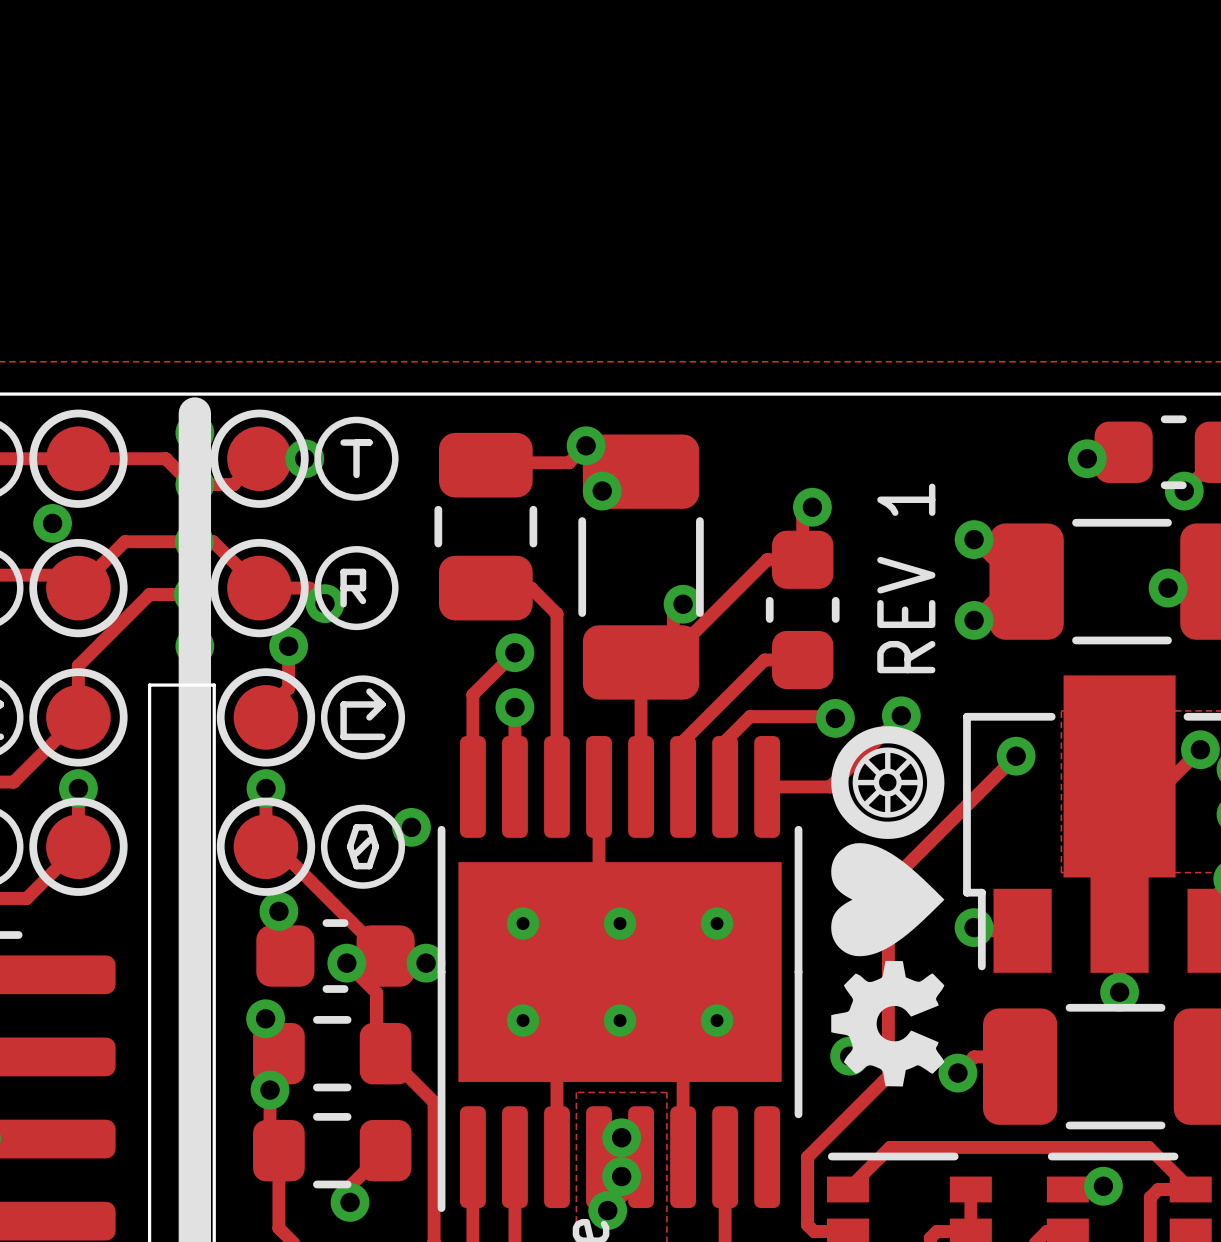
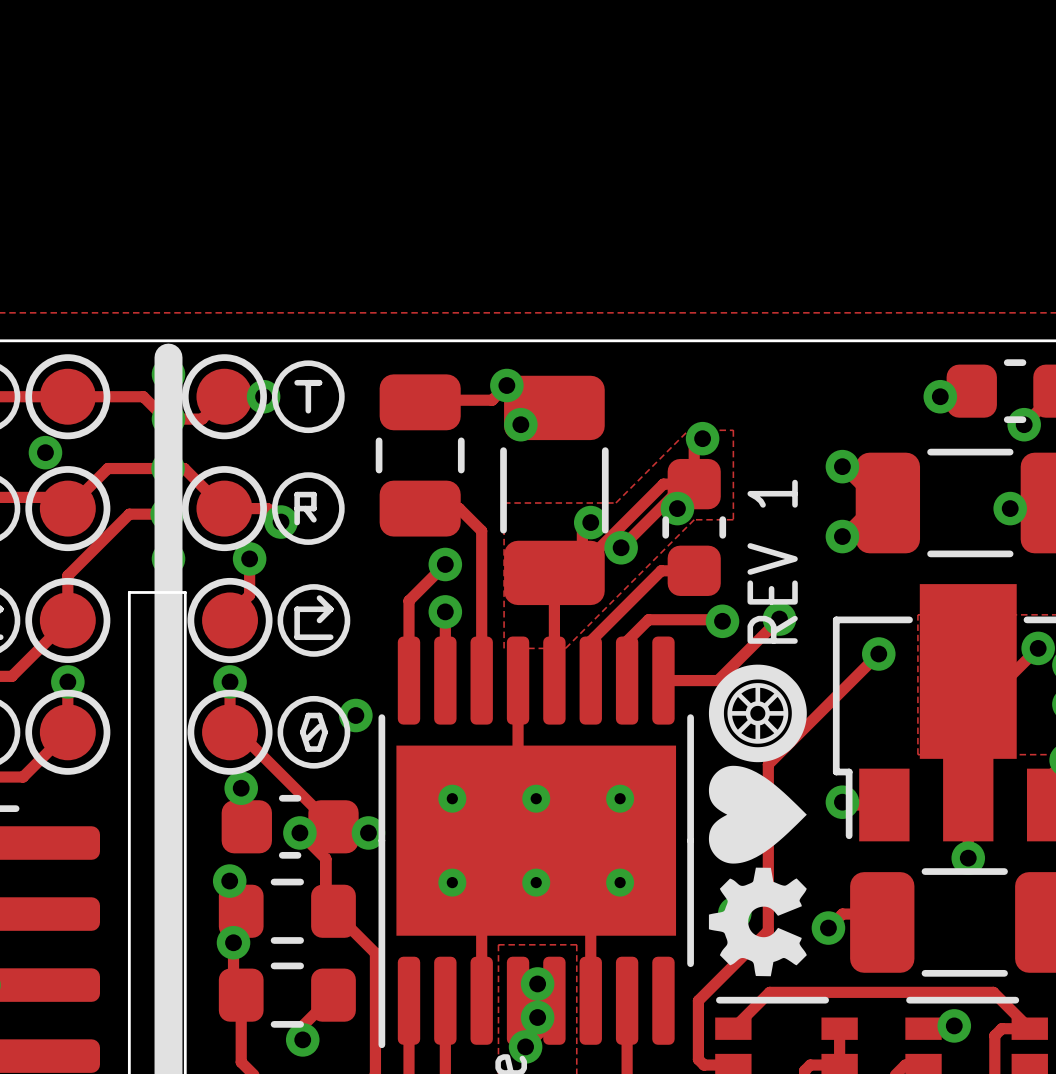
zone outline: none -> (688, 430) (615, 502) (504, 502) (504, 648) (565, 648) (694, 519) (733, 519) (733, 430) (688, 430)
track: none -> (684, 484) (621, 547)
text position: REV 1 (906, 578) -> REV 1 (772, 561)
via: none -> (677, 508)
via: none -> (621, 547)
drawing position: (887, 782) -> (757, 713)
drawing position: (887, 782) -> (757, 713)
drawing position: (887, 899) -> (757, 814)
drawing position: (887, 1023) -> (757, 921)

